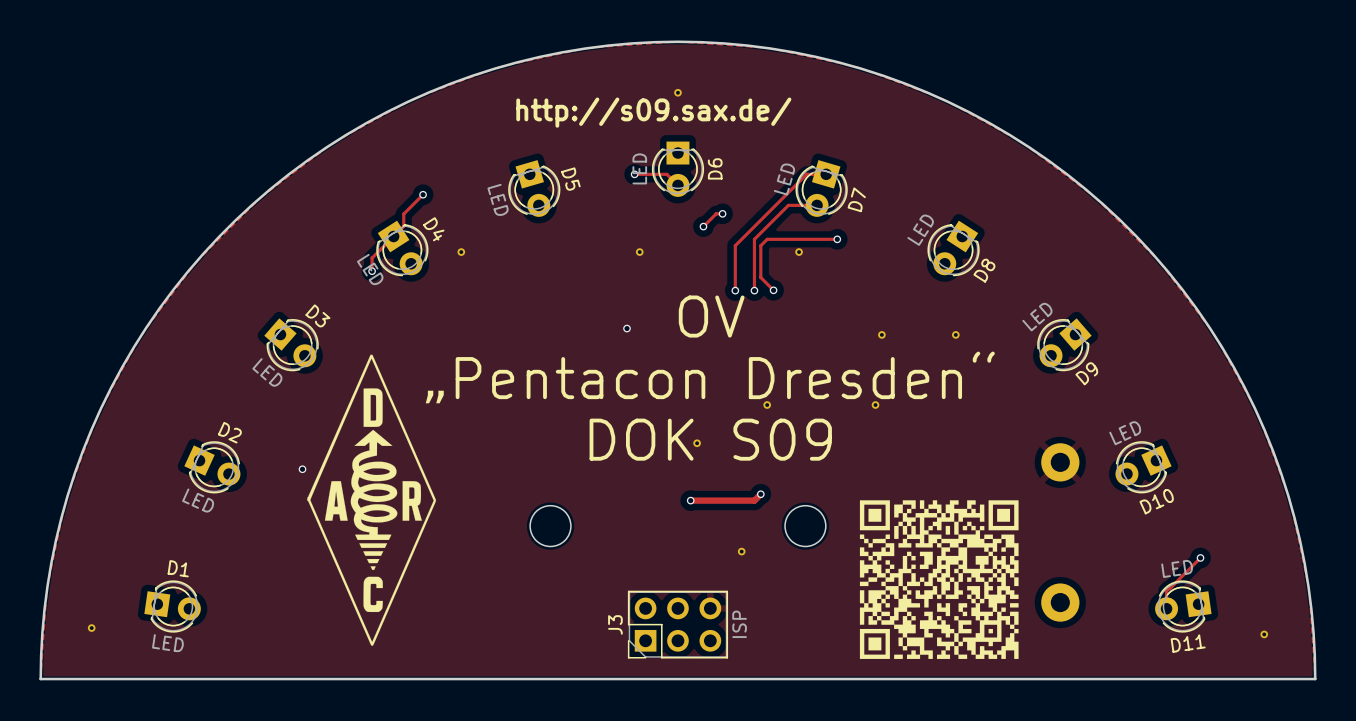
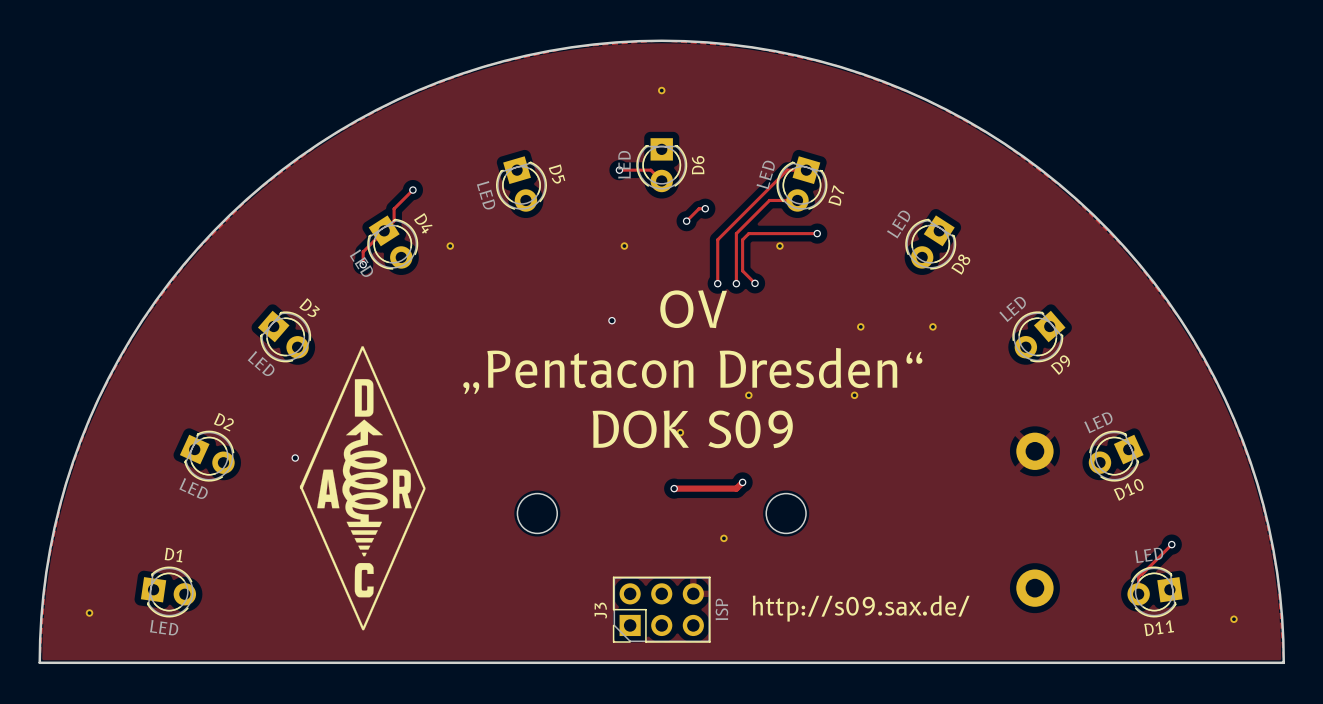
text: http://s09.sax.de/ (653, 112) -> none
drawing: [859, 500, 1019, 659] -> none
text: none -> http://s09.sax.de/ (861, 608)

